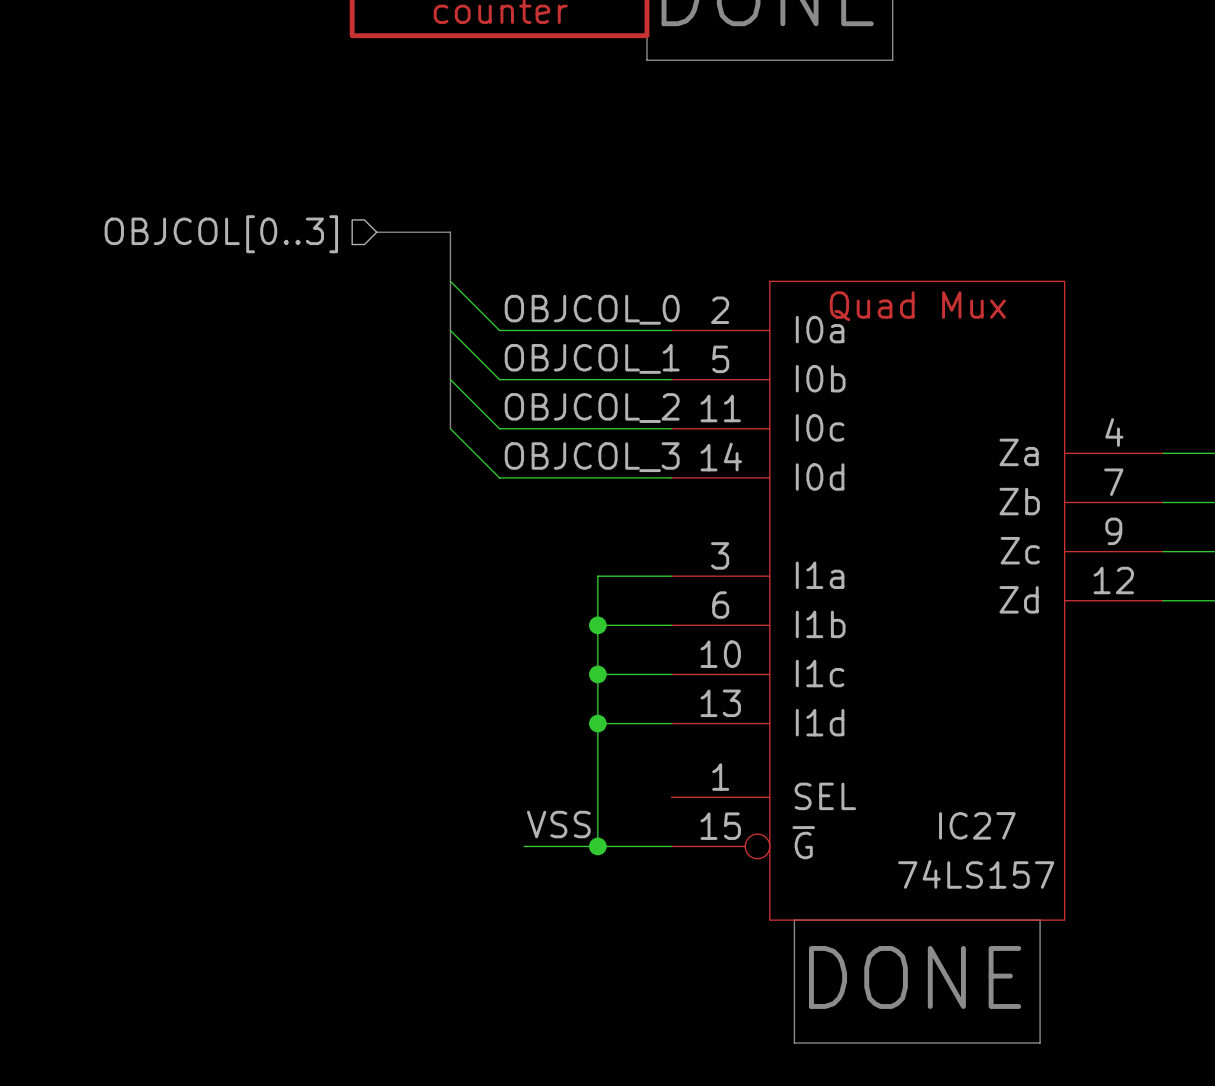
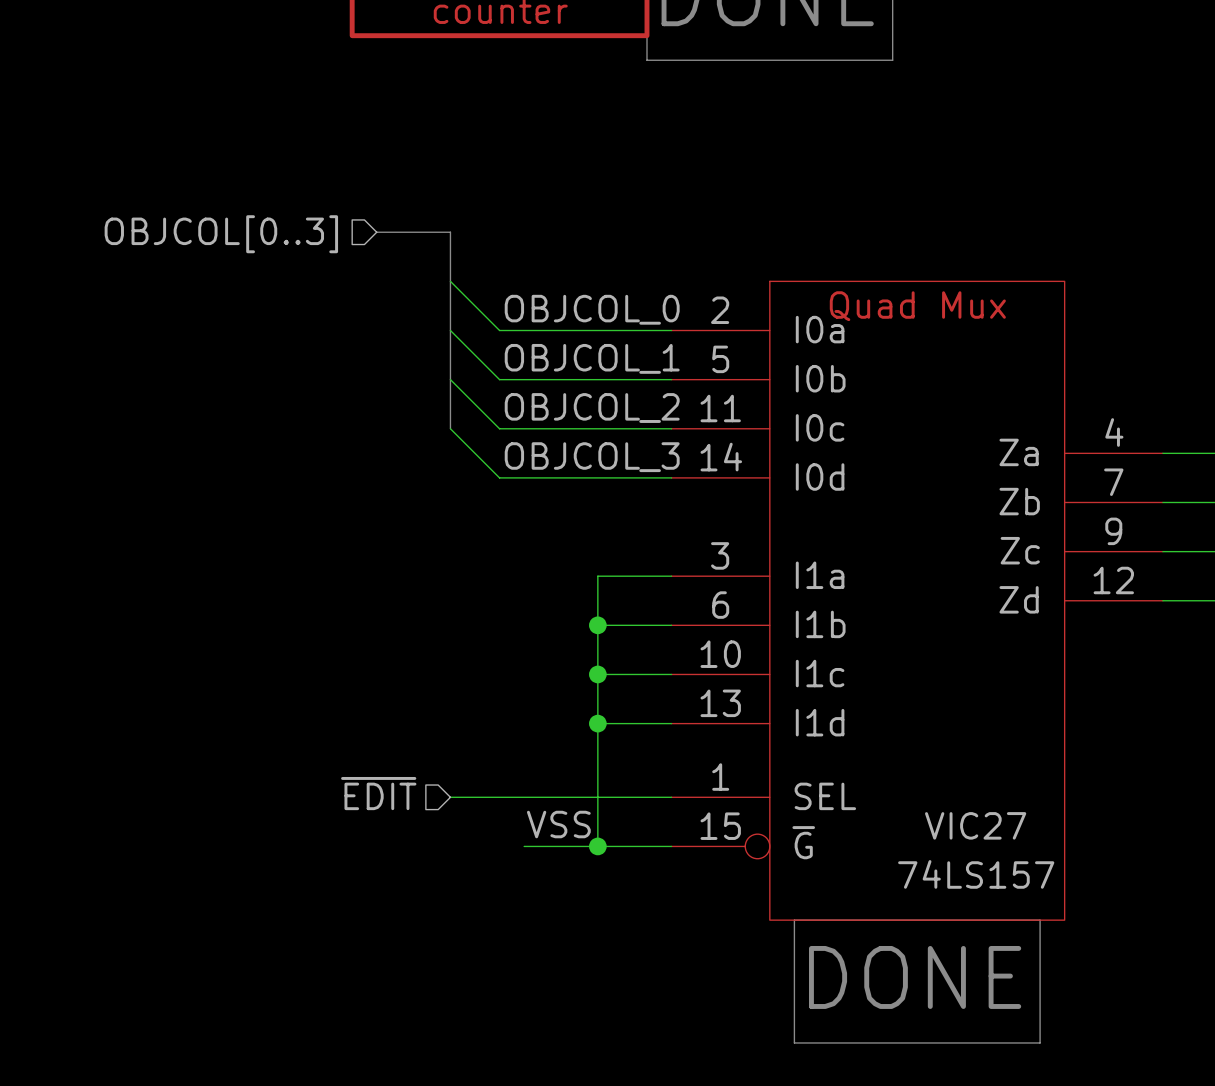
hierarchical label: none -> ~{EDIT} (378, 793)
wire: none -> (450, 797) (671, 797)
IC27 name: IC27 (977, 825) -> VIC27 (975, 825)

